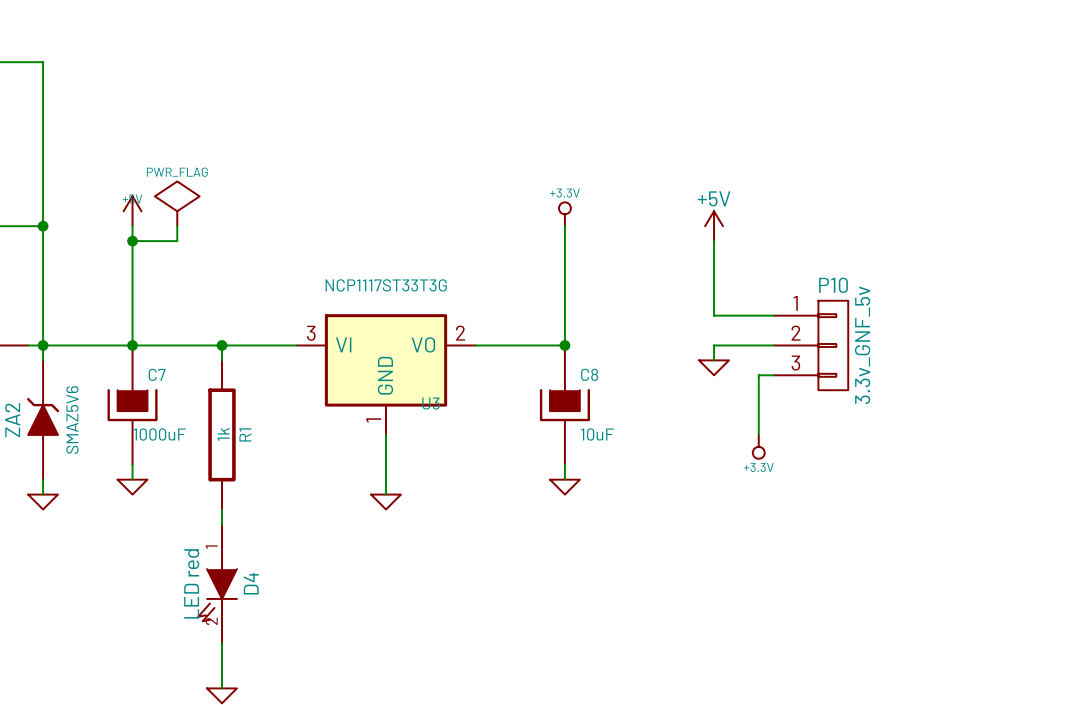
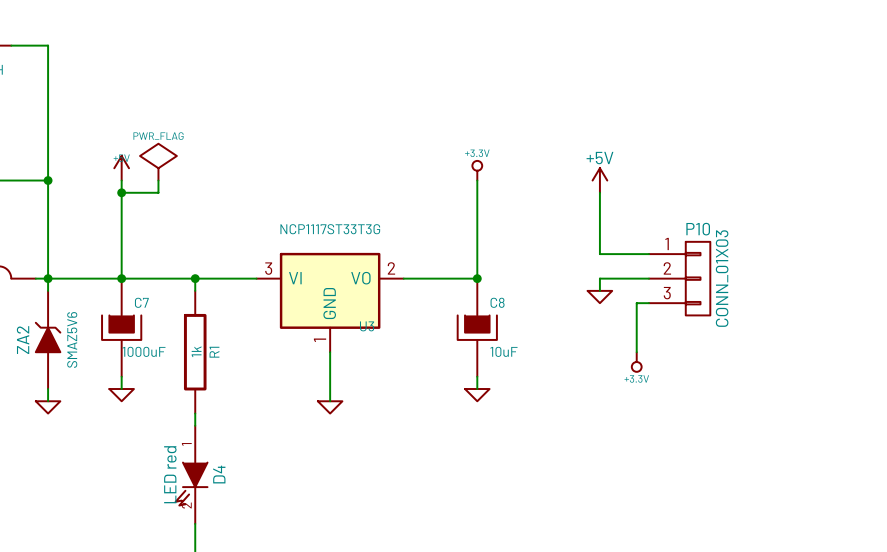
P10 value: 3.3v_GNF_5v (862, 345) -> CONN_01X03 (722, 278)

